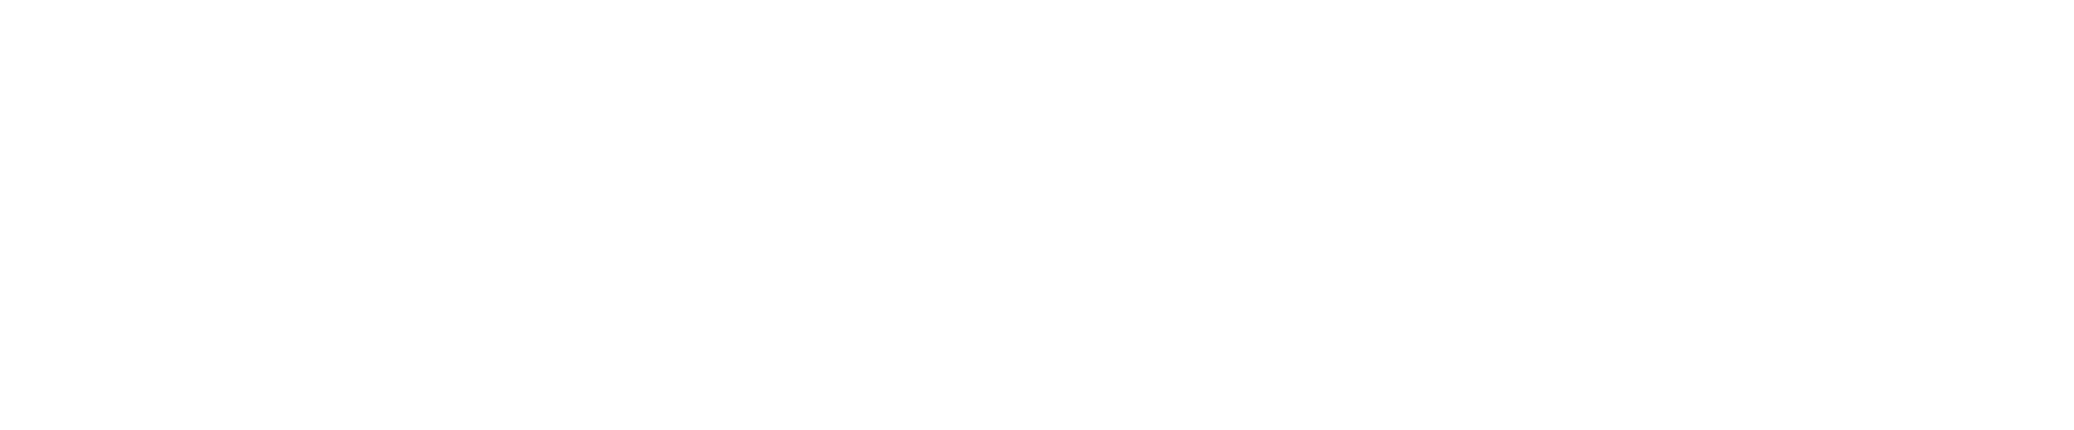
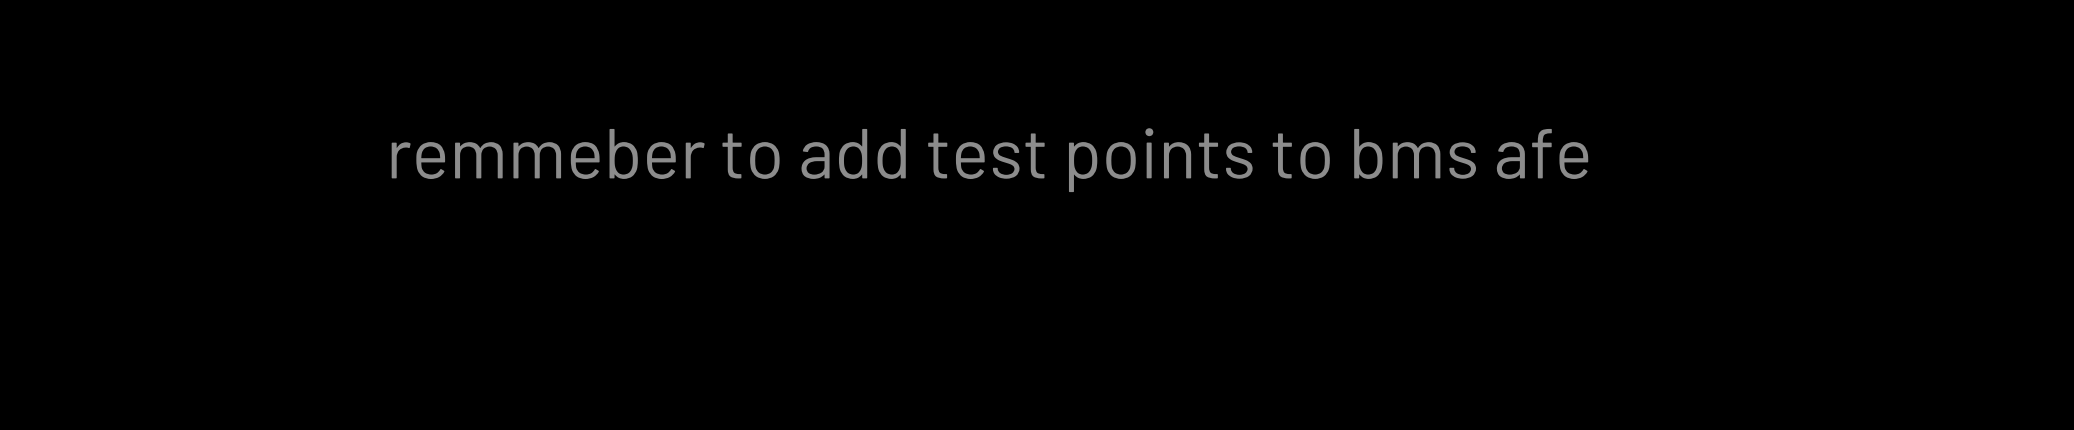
text: none -> remmeber to add test points to bms afe (989, 160)

